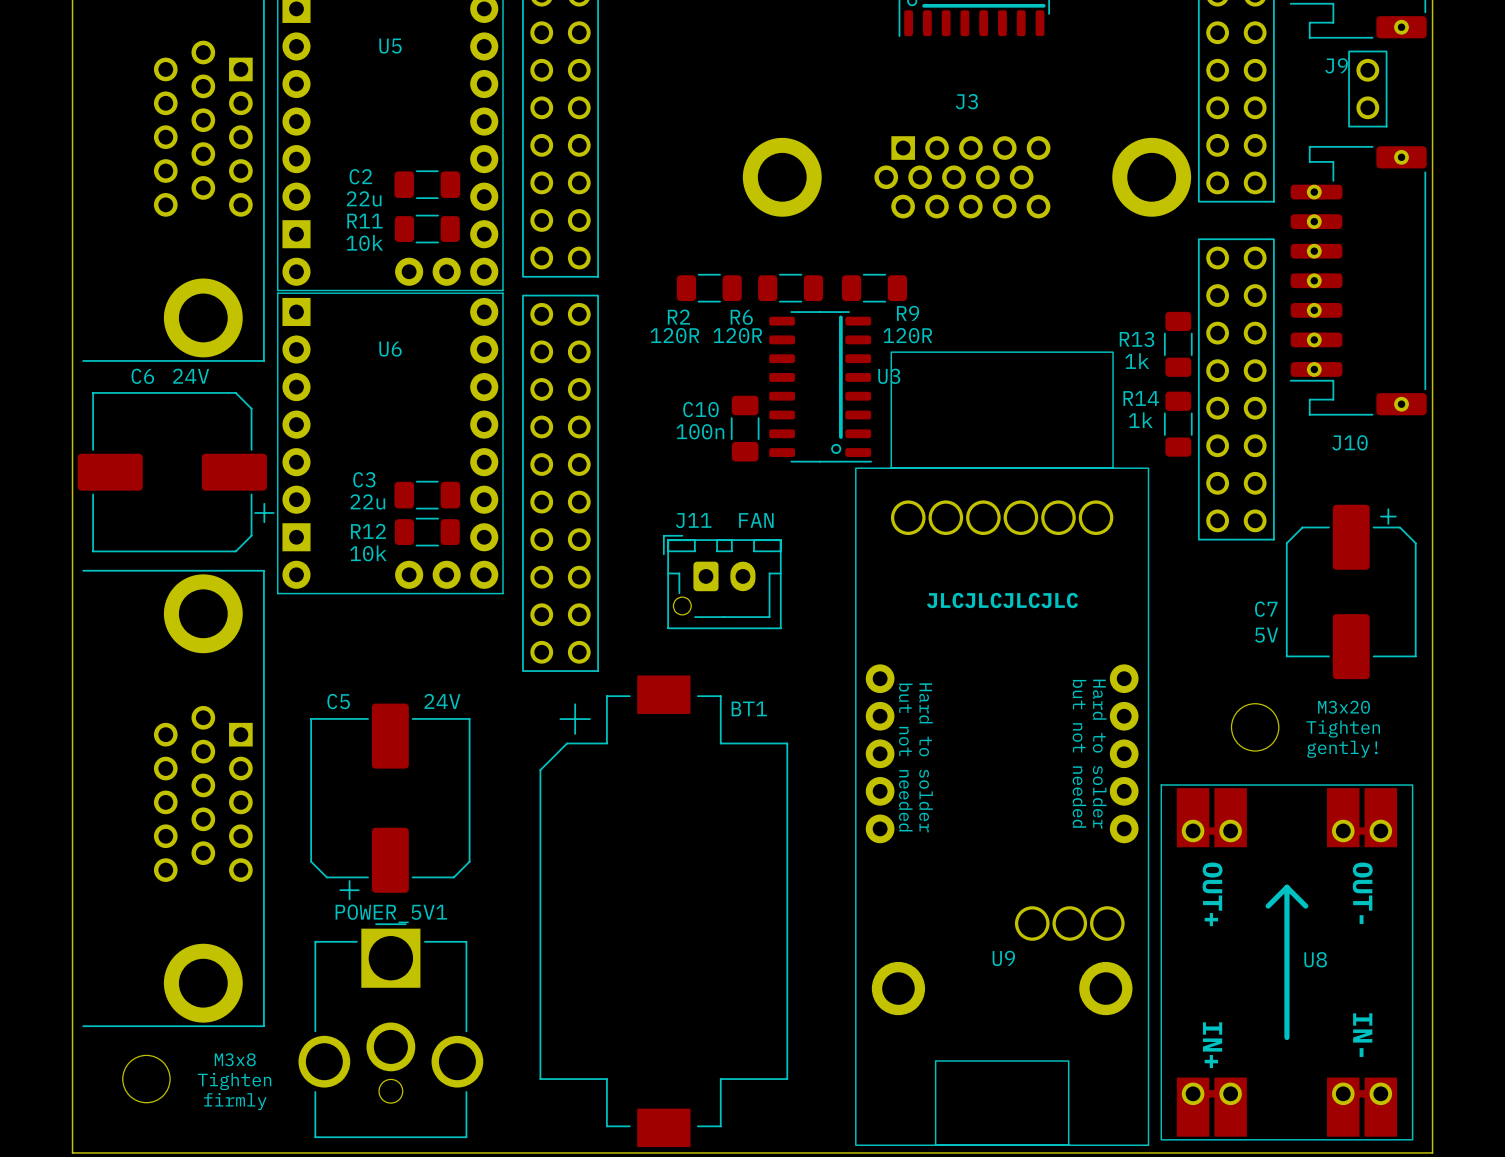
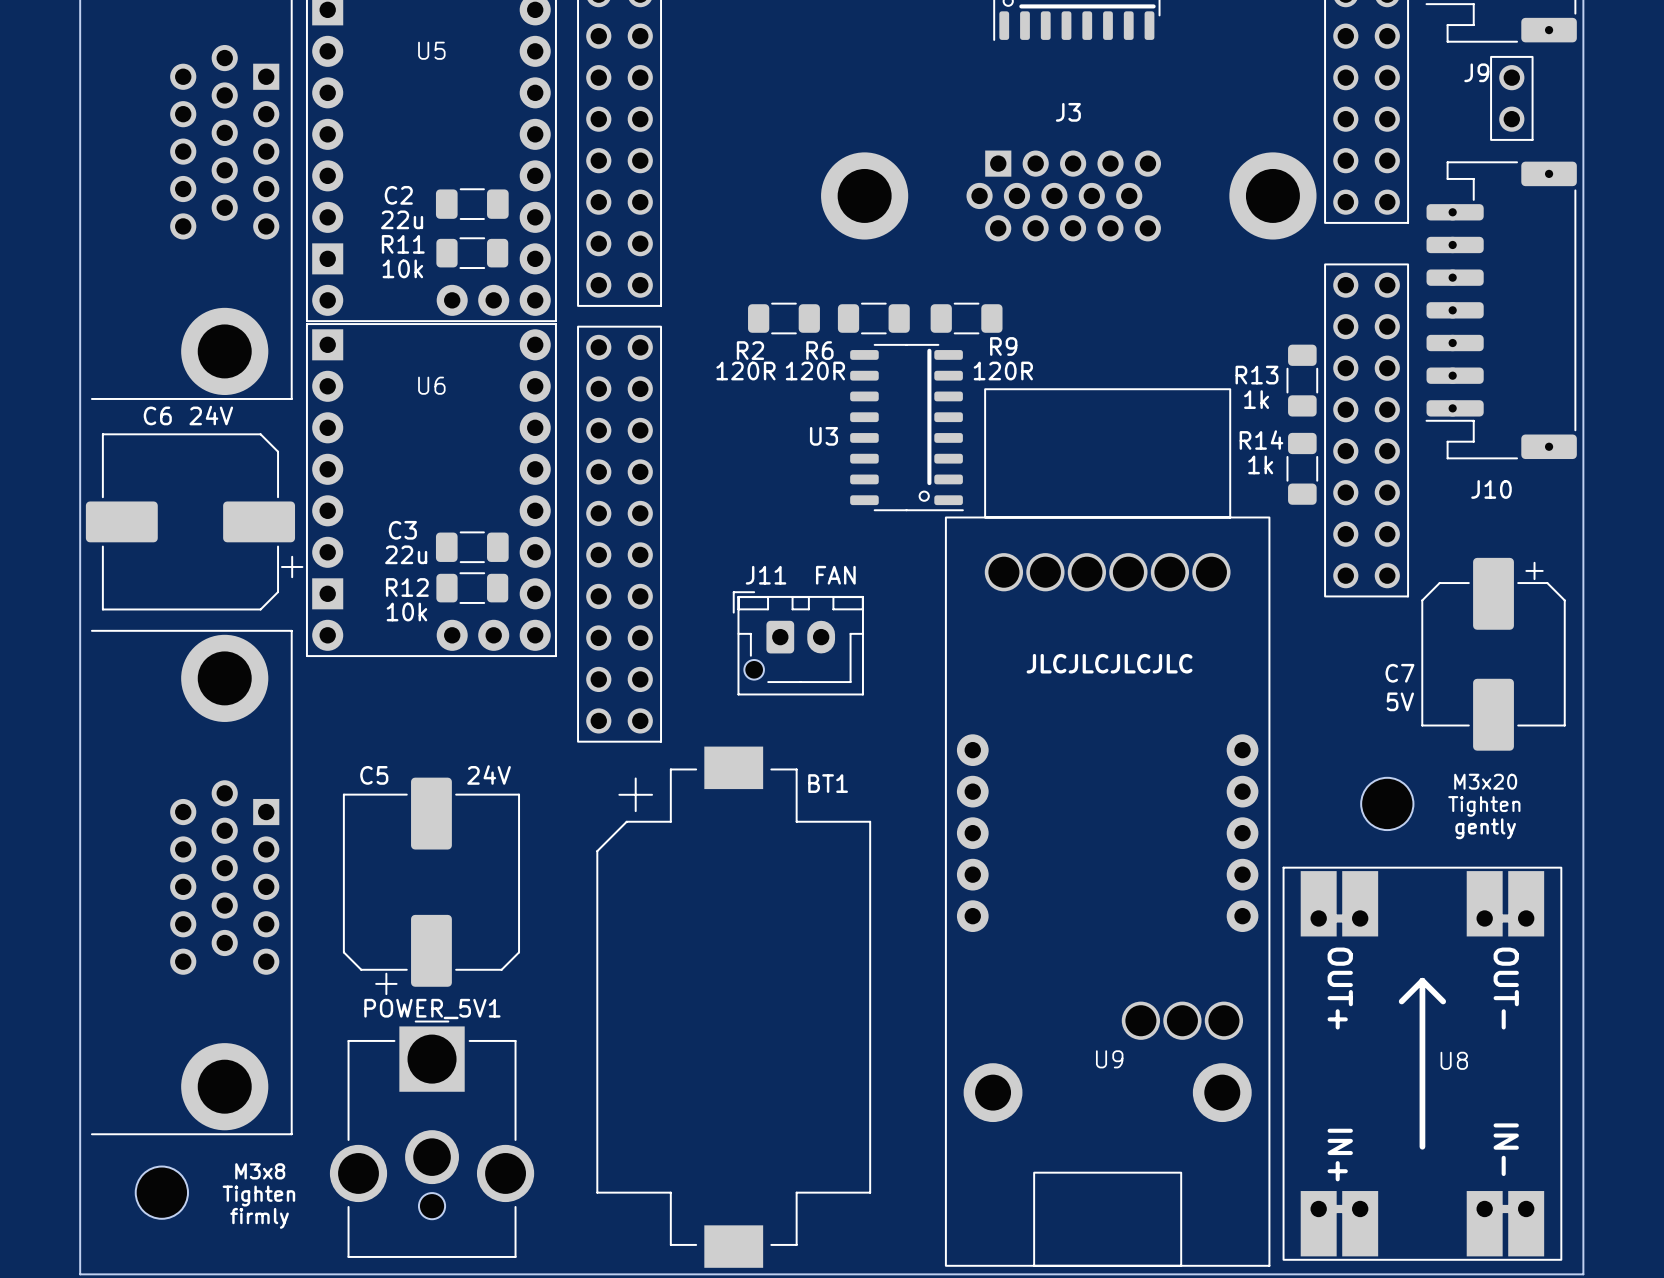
U3 name position: U3 (889, 376) -> U3 (823, 436)
C10: 100n (745, 428) -> none
text: gently! (1342, 749) -> gently (1485, 828)
text: but not needed (1079, 753) -> none
text: Hard to solder (1099, 754) -> none
text: but not needed (905, 757) -> none
text: Hard to solder (926, 757) -> none

